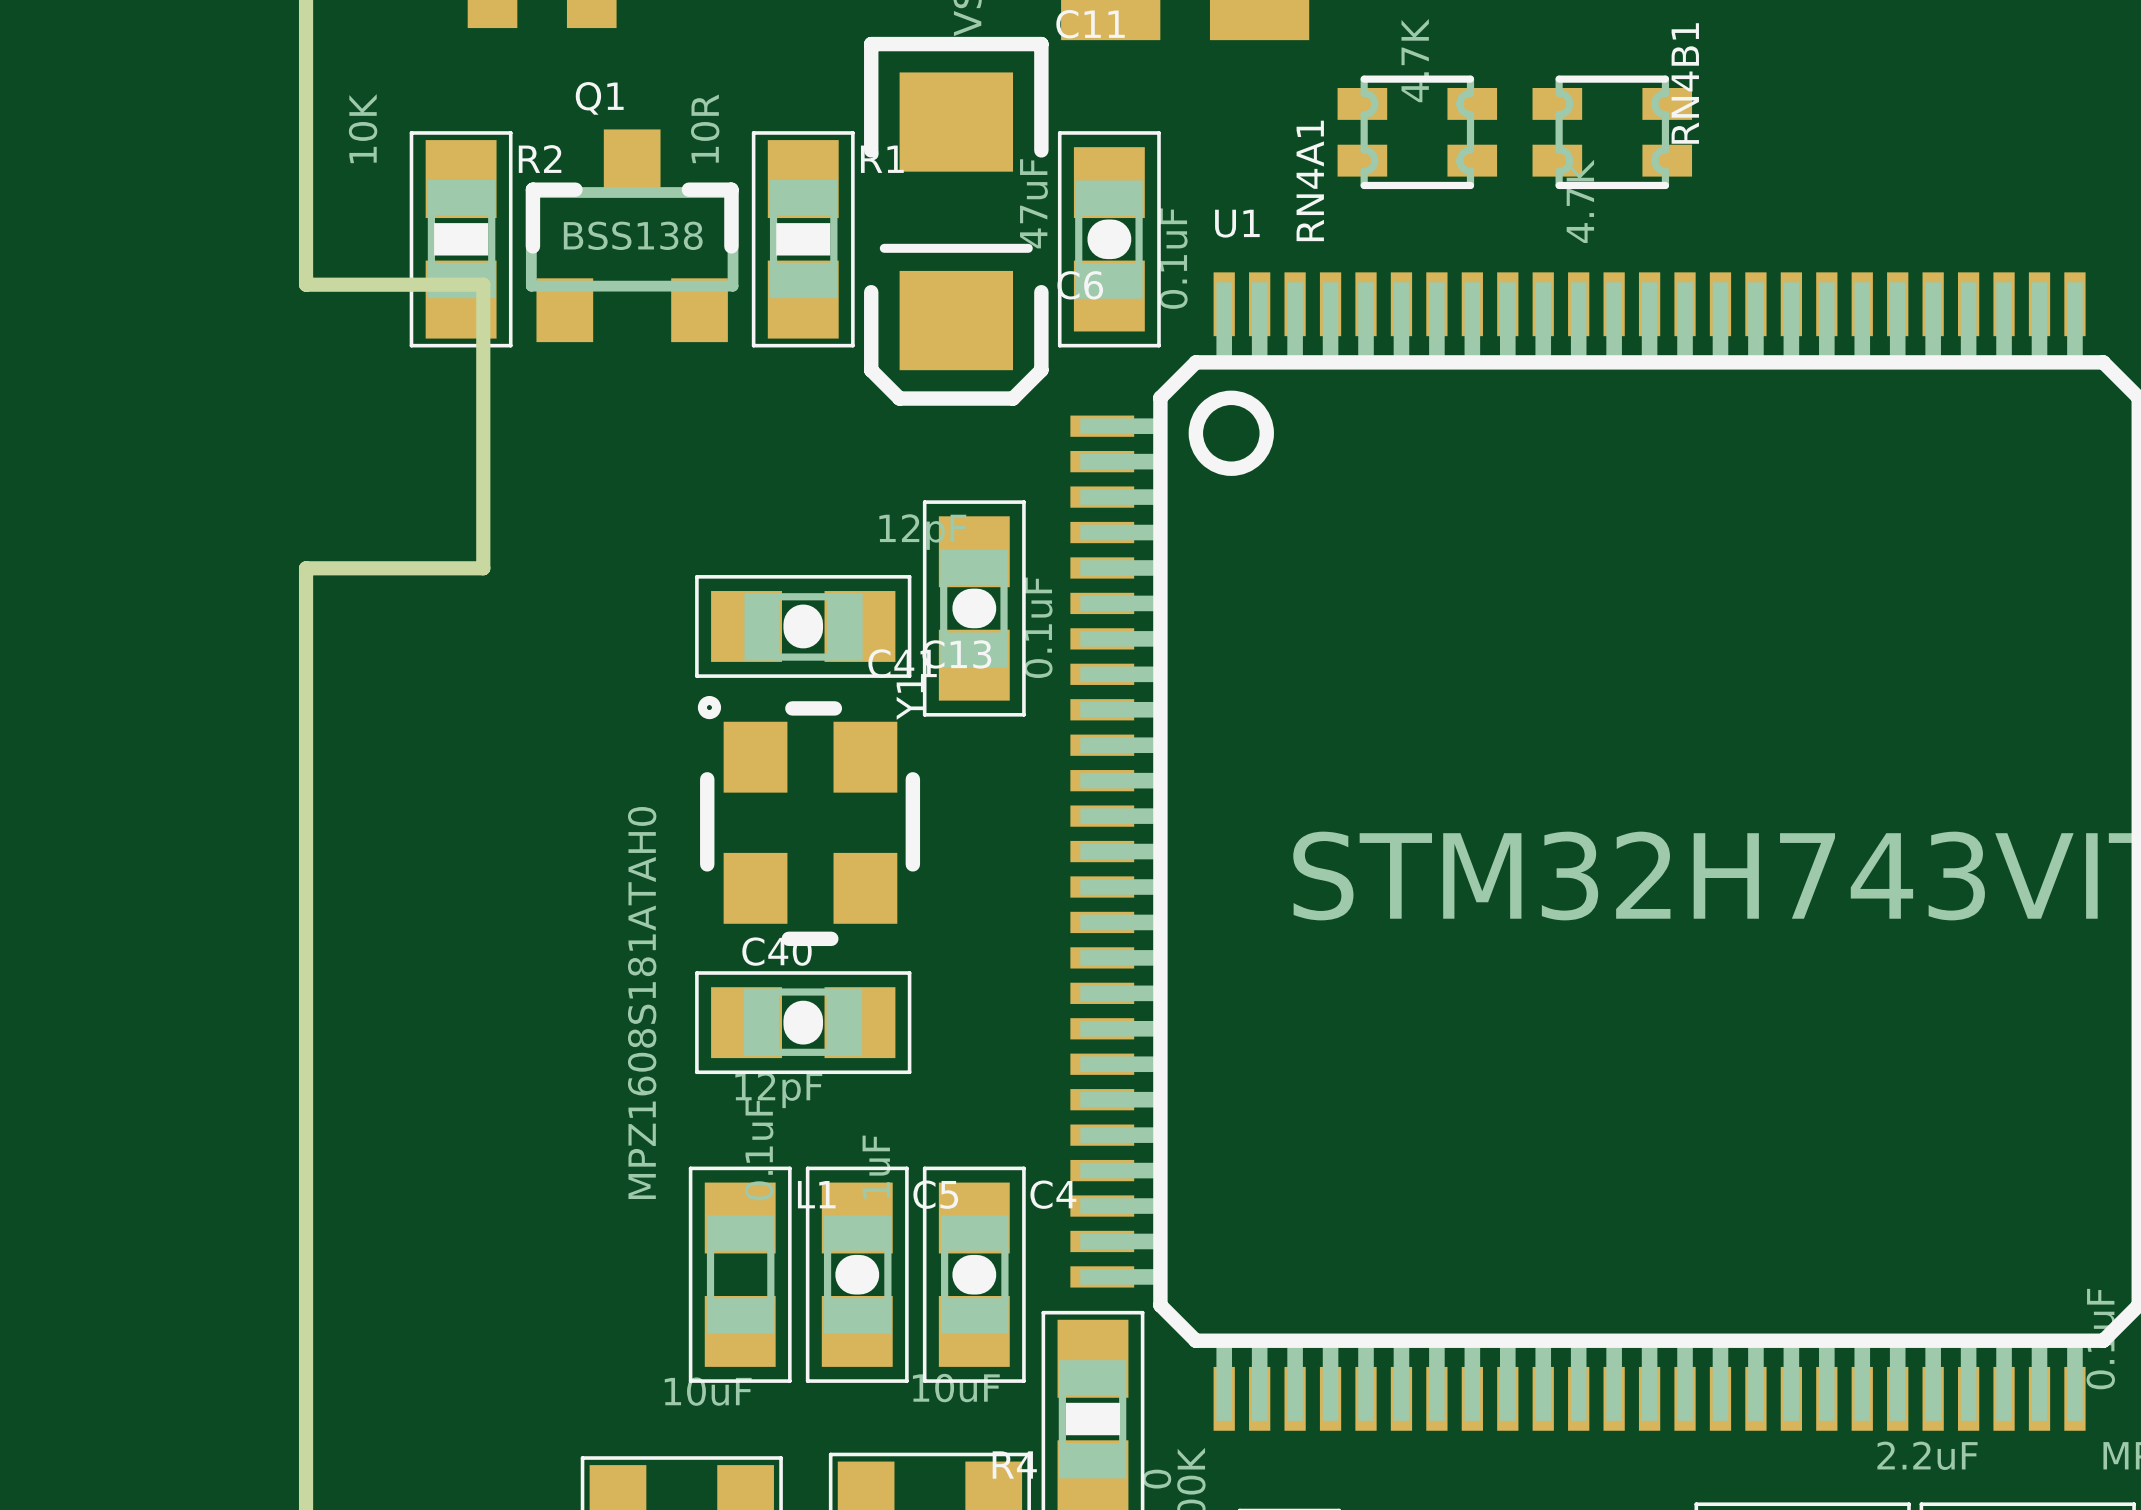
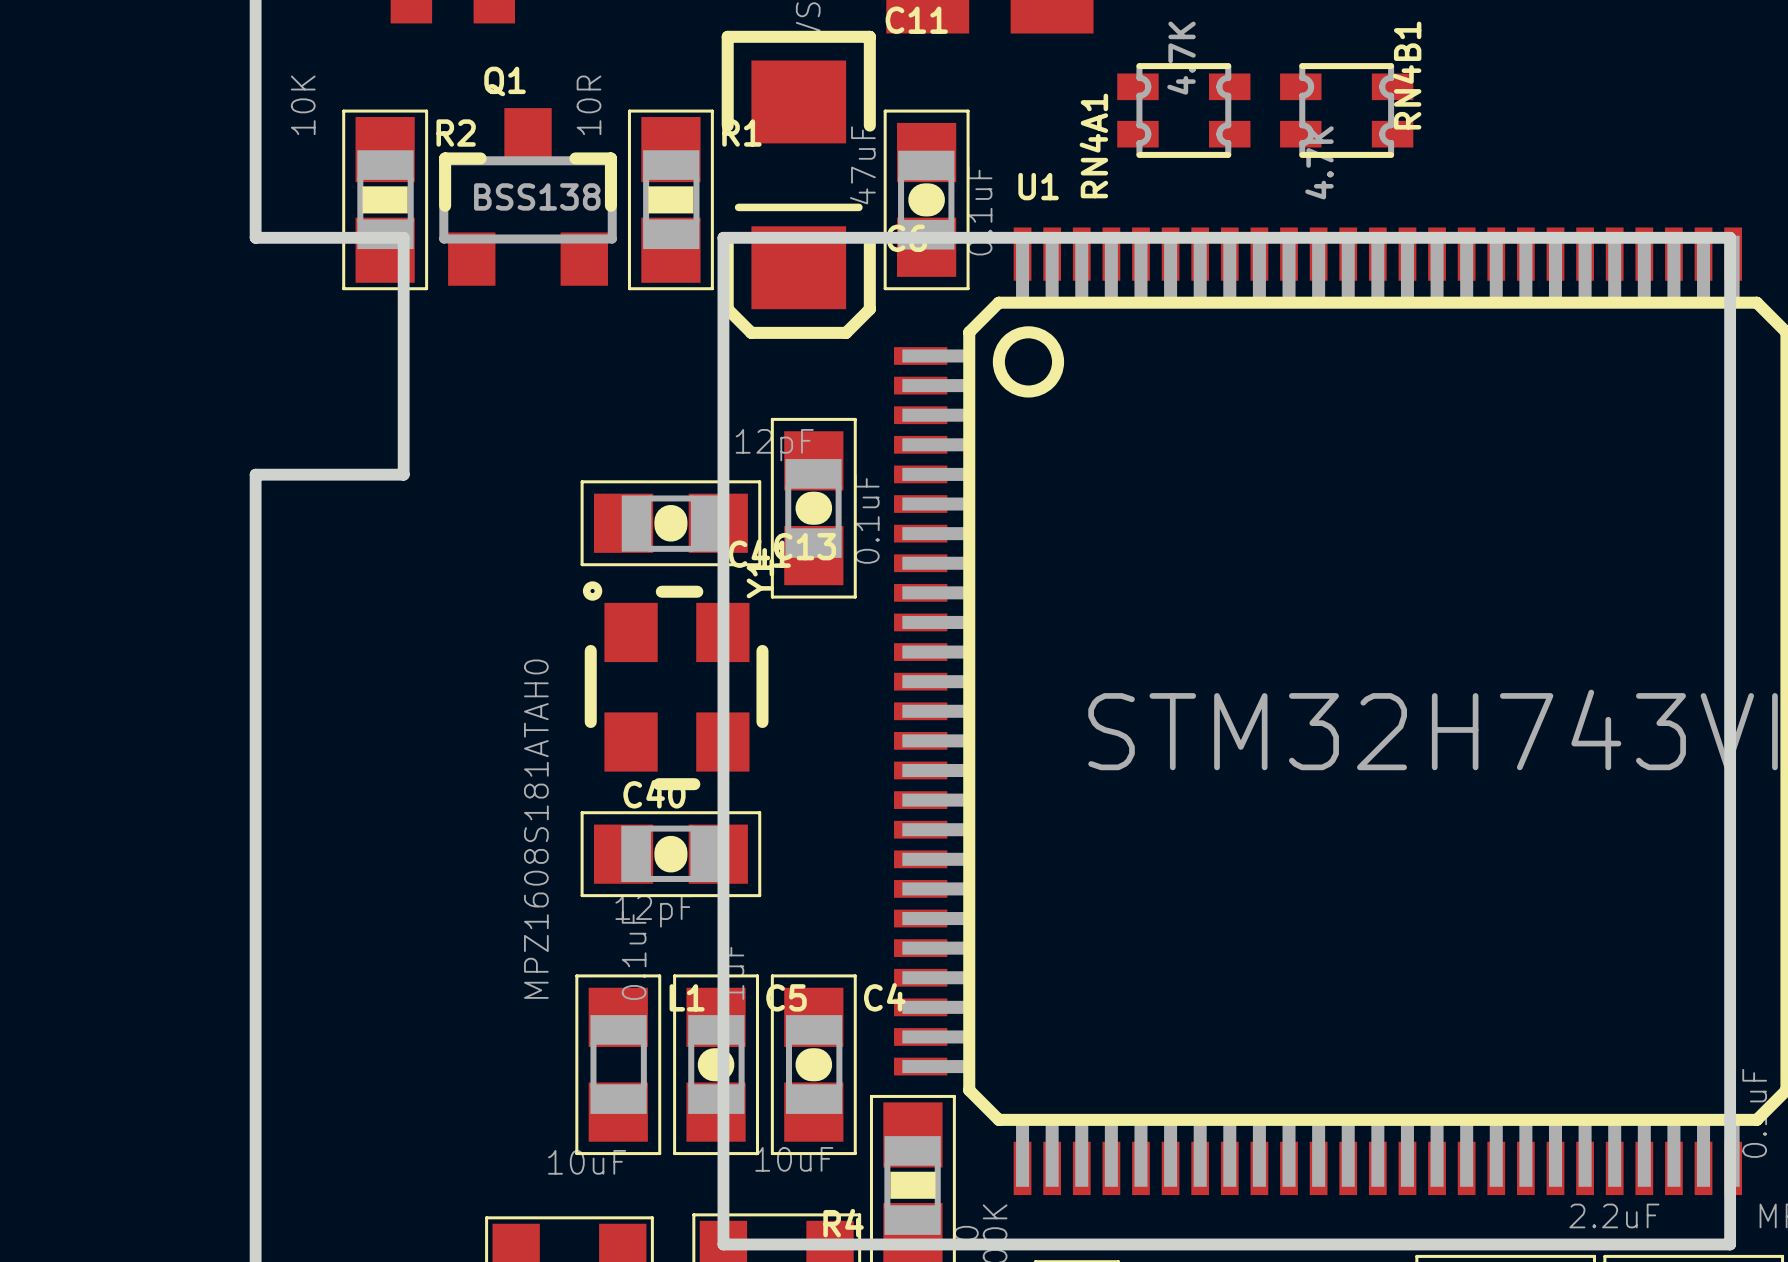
board edge: none -> (723, 237) (723, 1244) (1730, 1244) (1730, 237) (723, 237)

